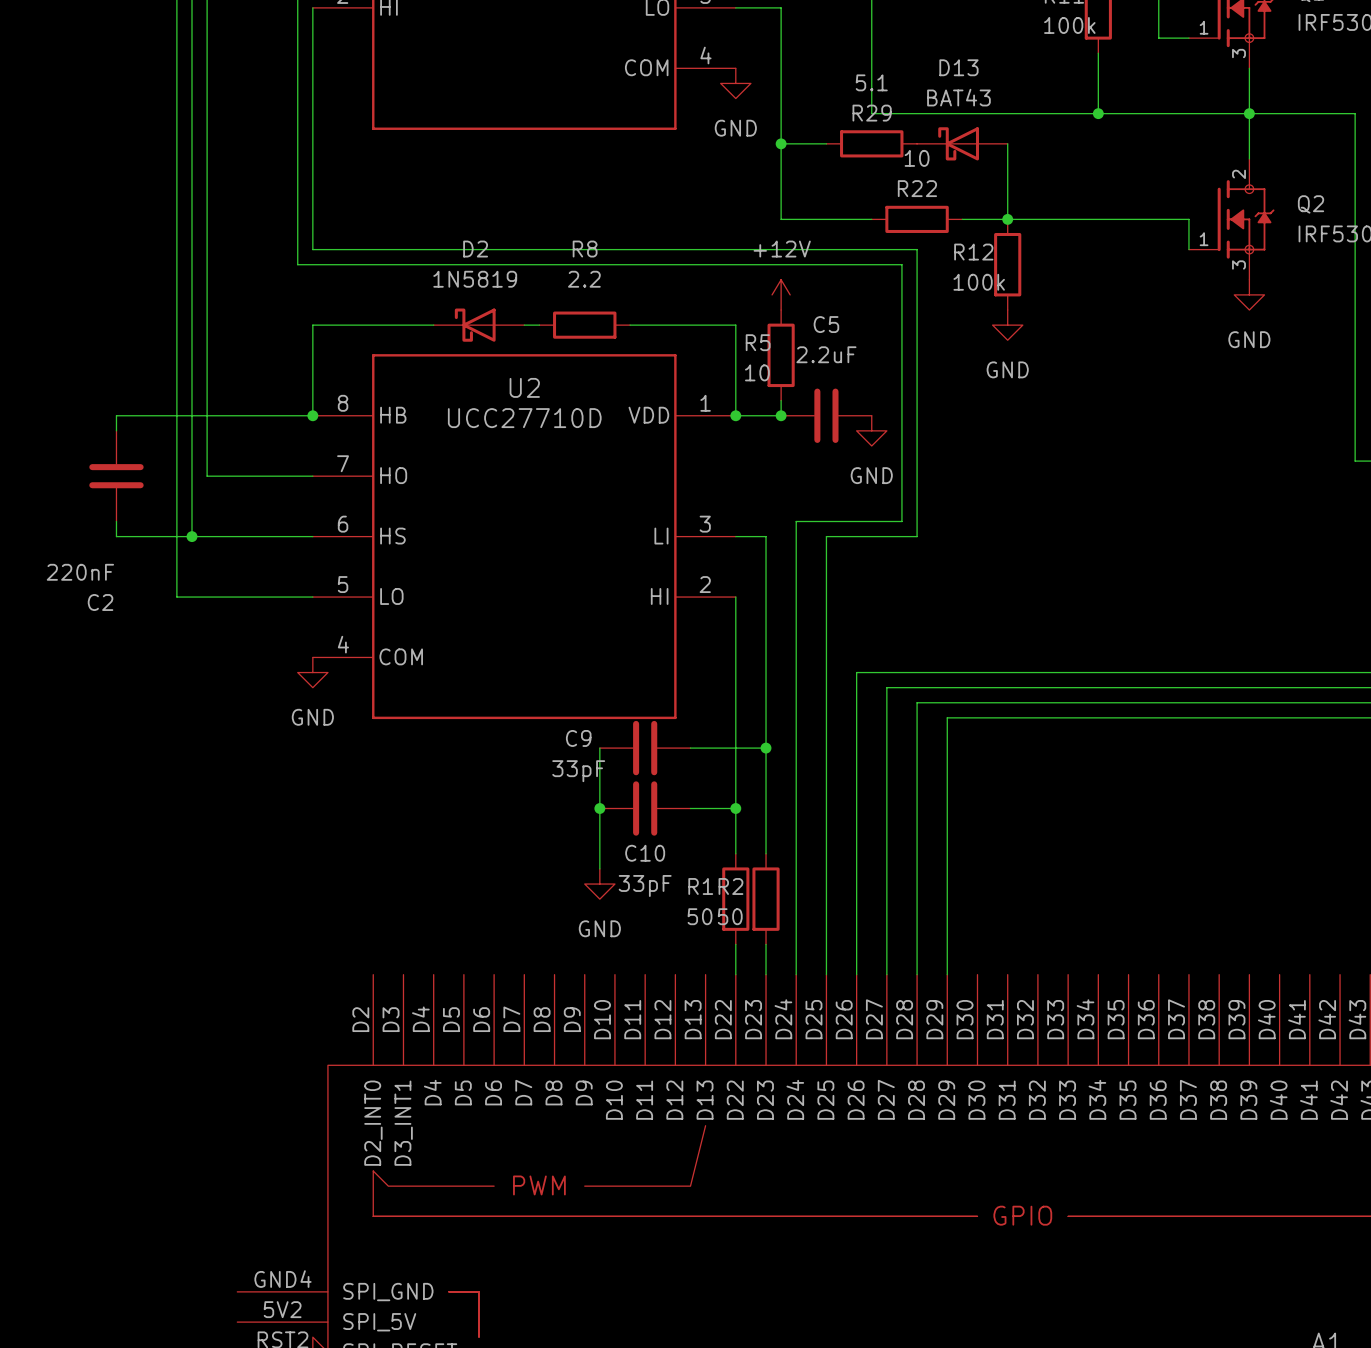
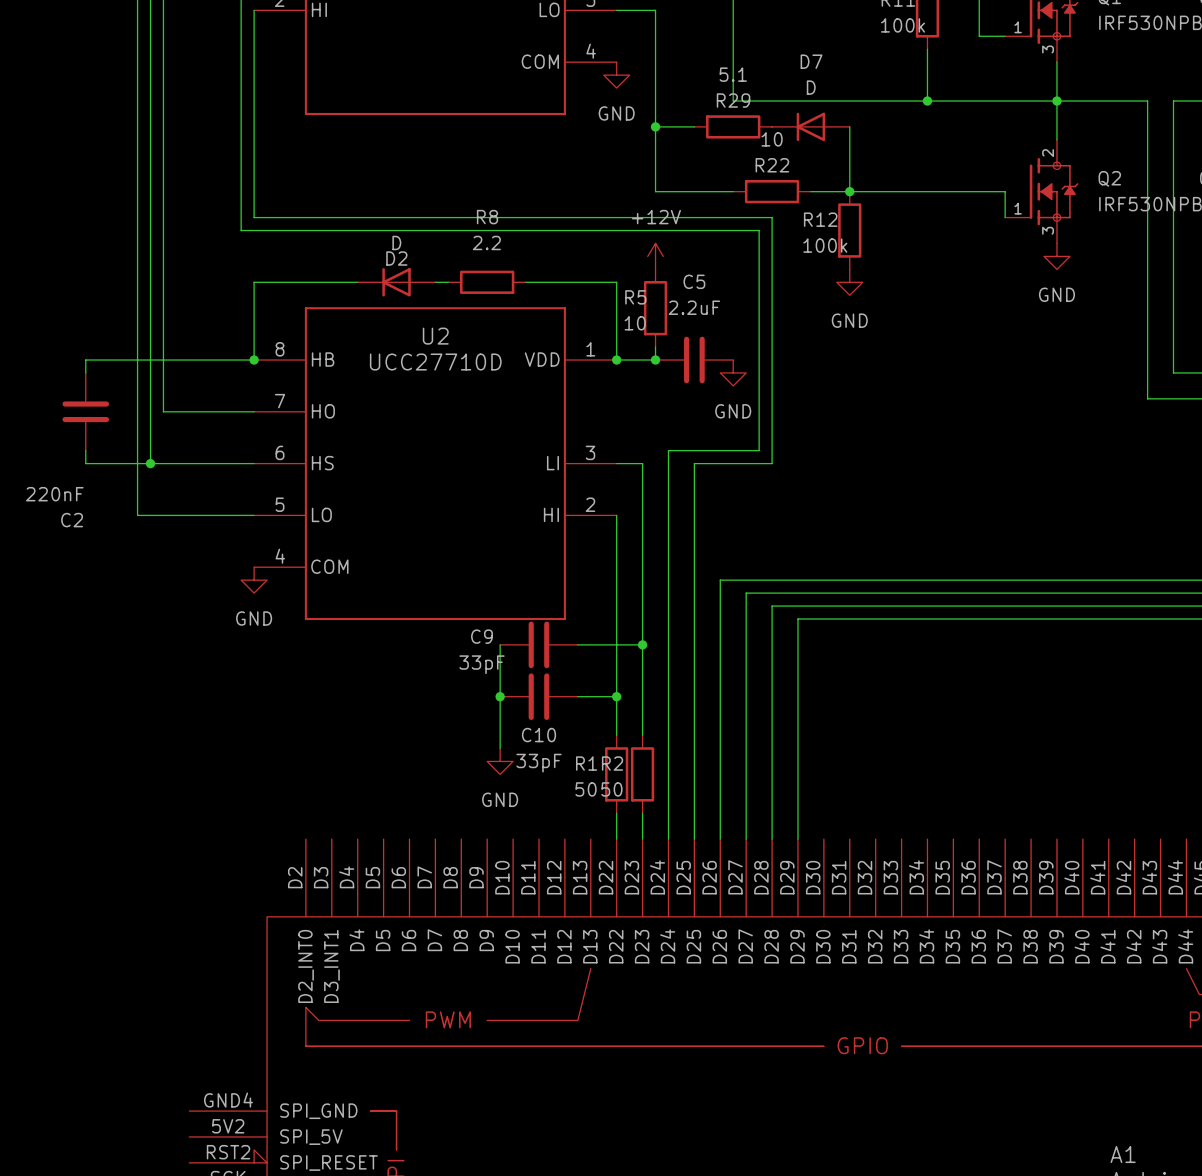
D13: BAT43 (962, 143) -> none
D7: none -> D (810, 126)
D2 name position: D2 (475, 249) -> D2 (396, 258)
D2 value: 1N5819 (475, 279) -> D (396, 242)
D2 symbol: [433, 308, 525, 342] -> [357, 268, 436, 297]

